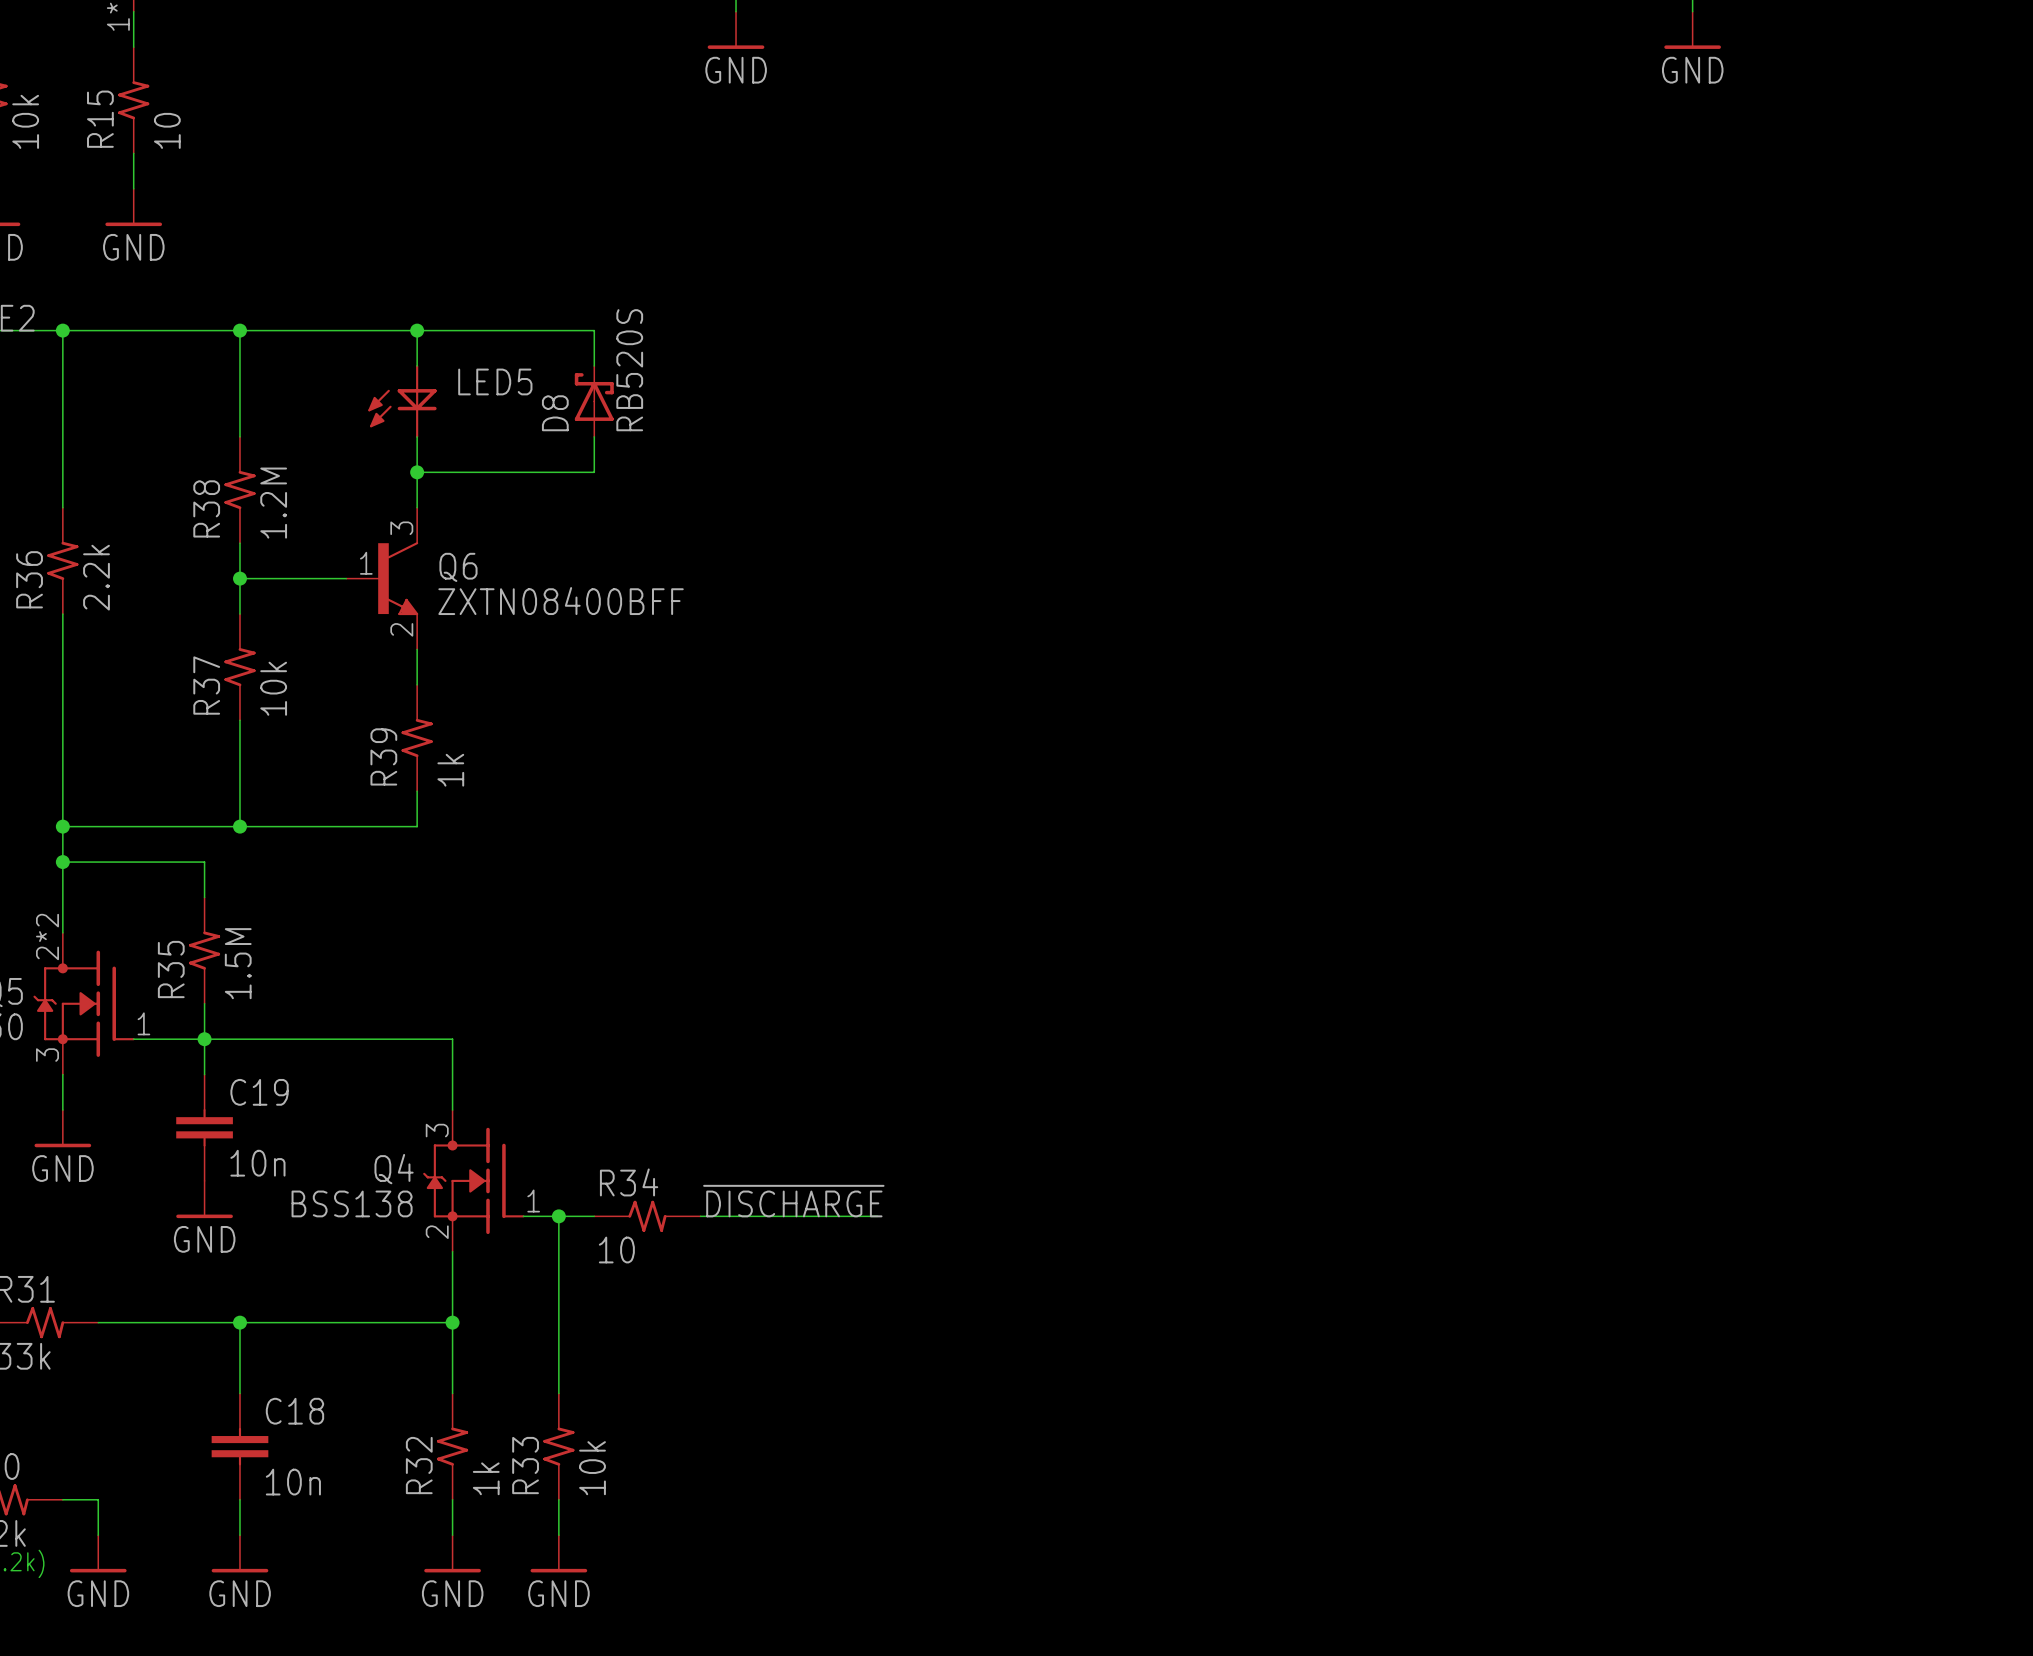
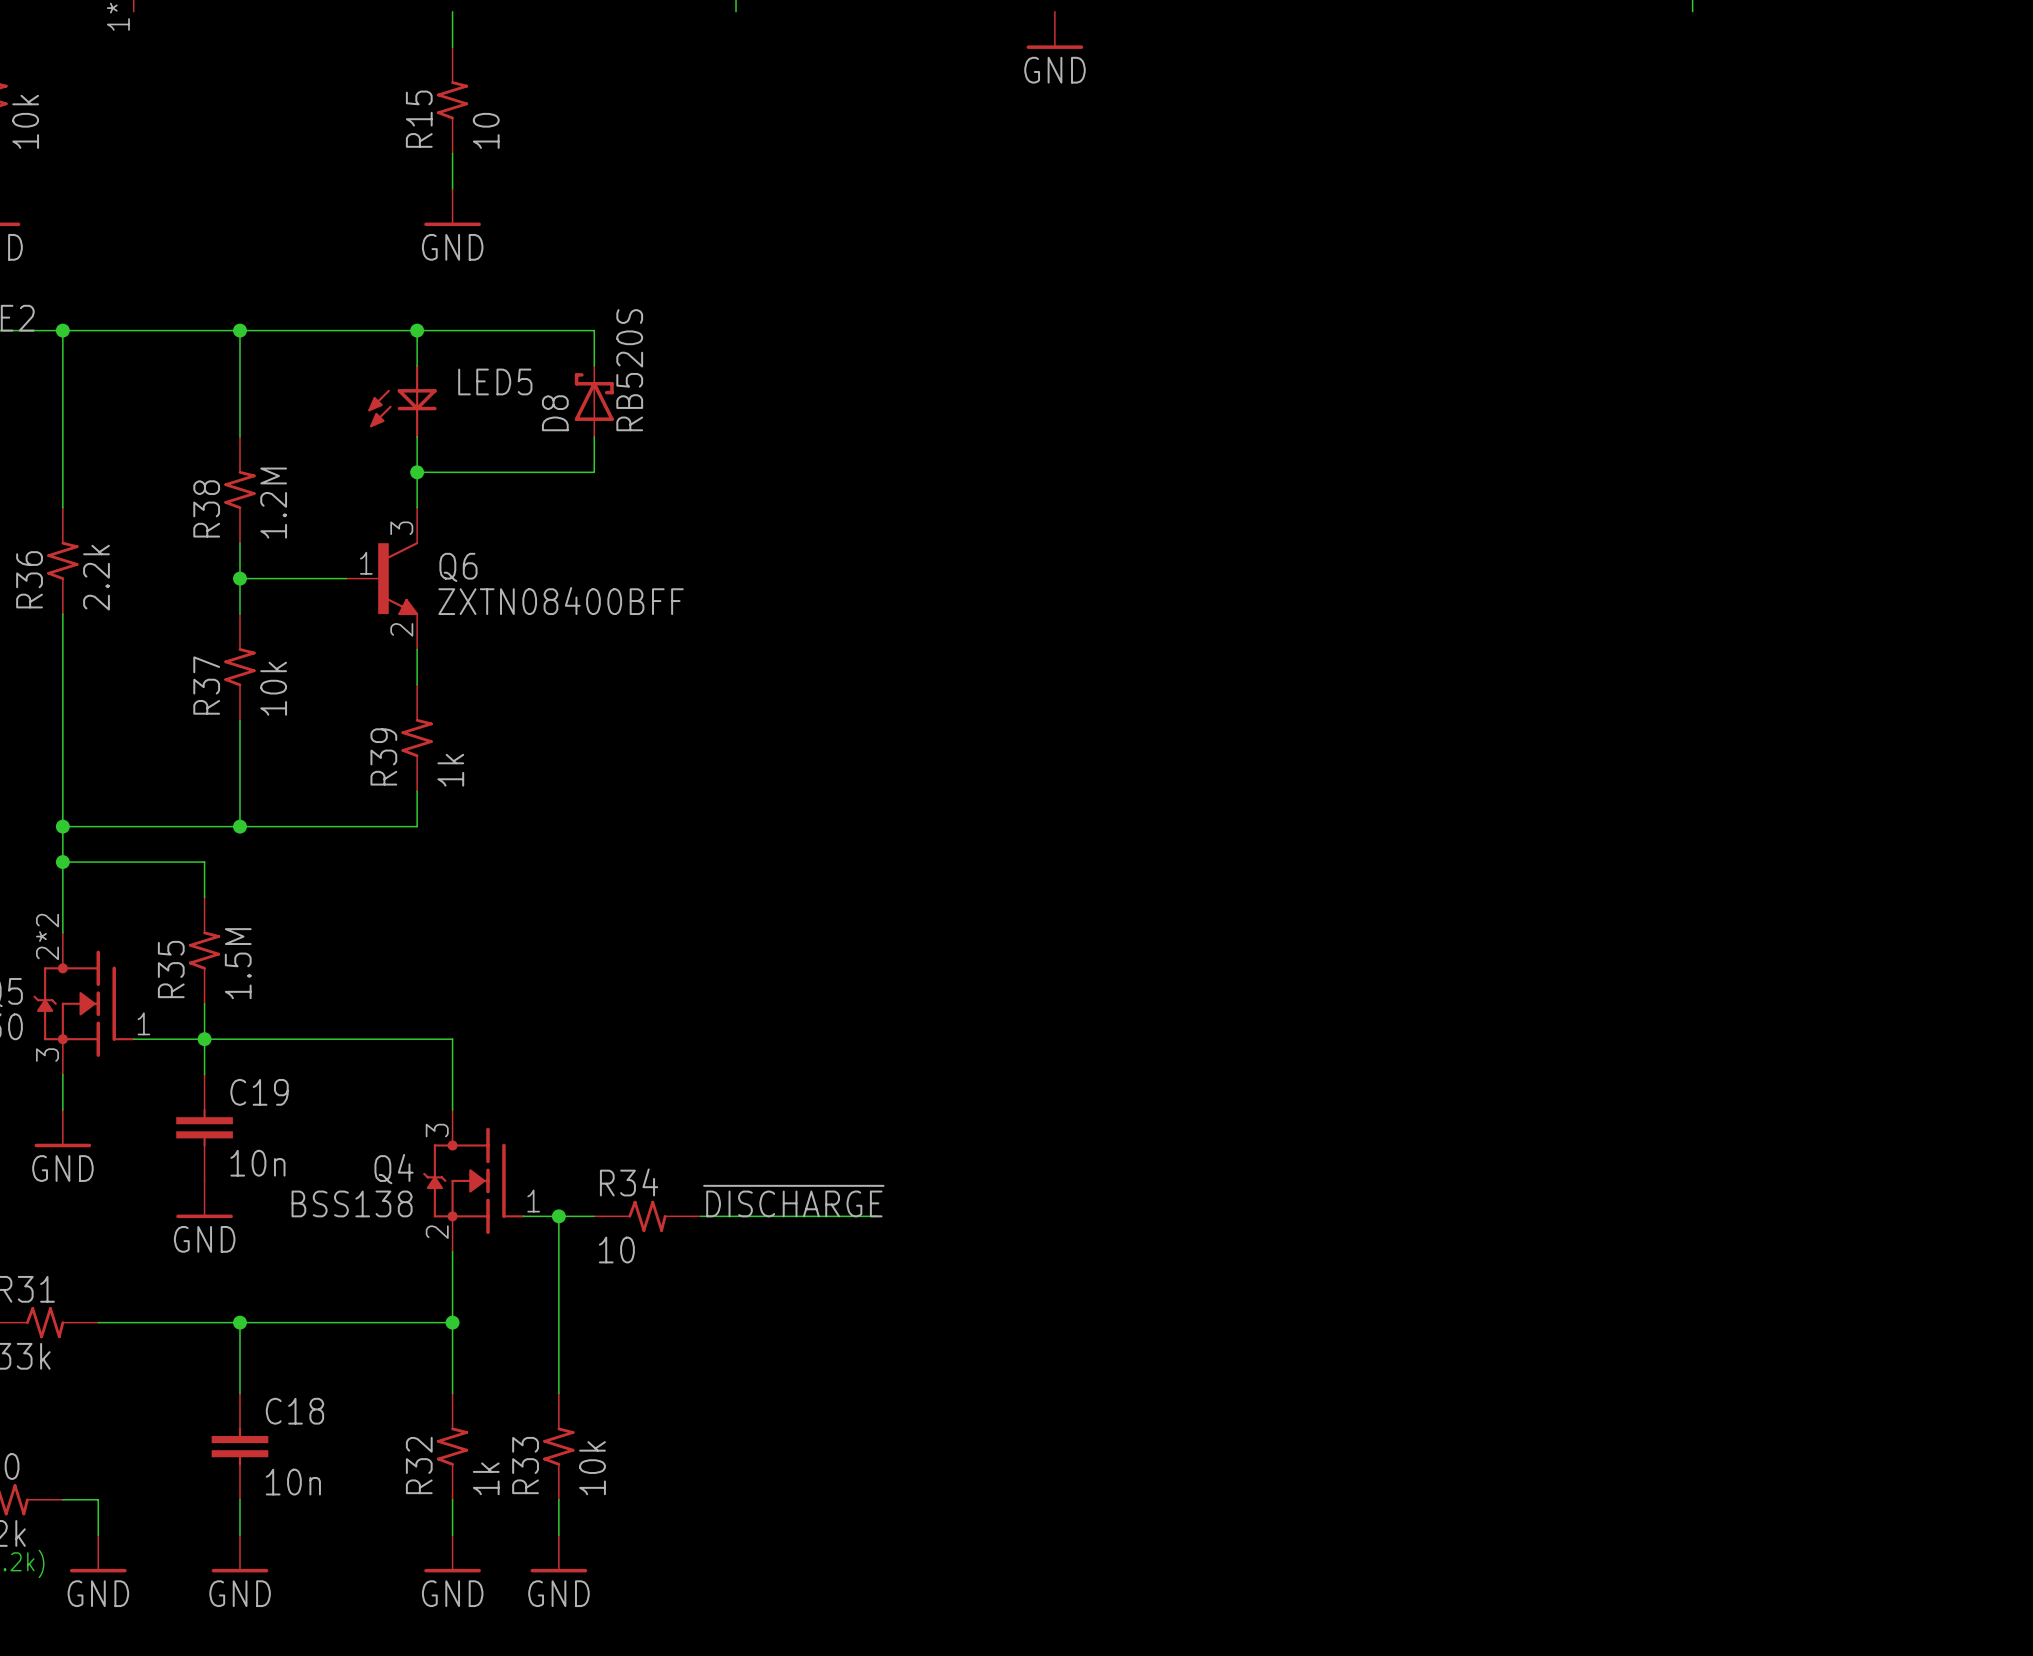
wire: (133, 11) (133, 47) -> (452, 11) (452, 47)
power symbol: GND (736, 30) -> none
power symbol: none -> GND (1054, 30)
power symbol: GND (1692, 30) -> none
R15 position: (133, 100) -> (452, 100)
wire: (133, 153) (133, 188) -> (452, 153) (452, 188)
power symbol: GND (133, 207) -> none
power symbol: none -> GND (452, 207)

